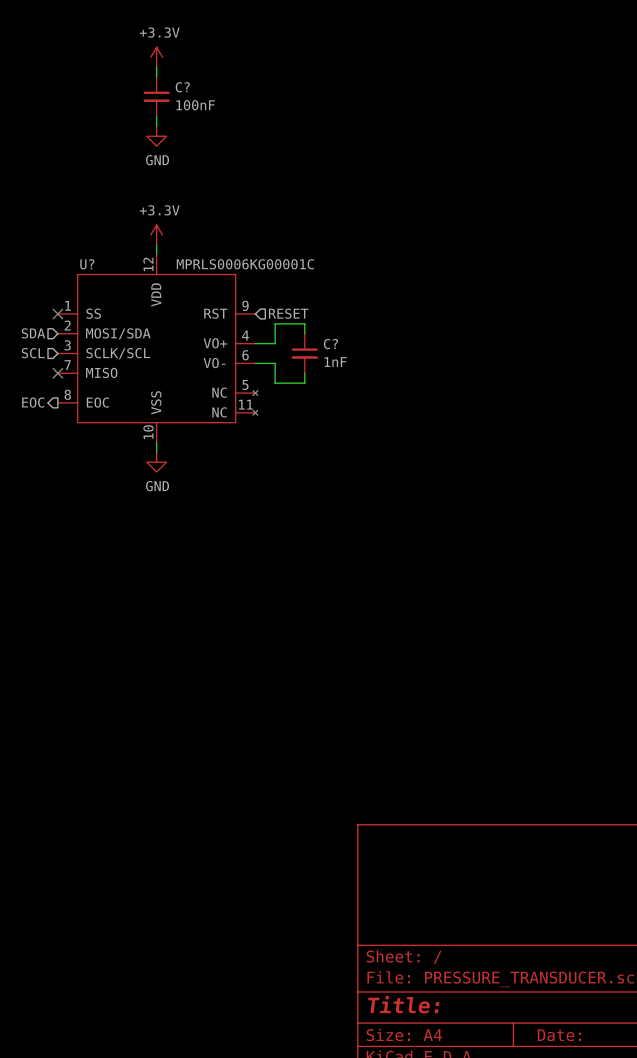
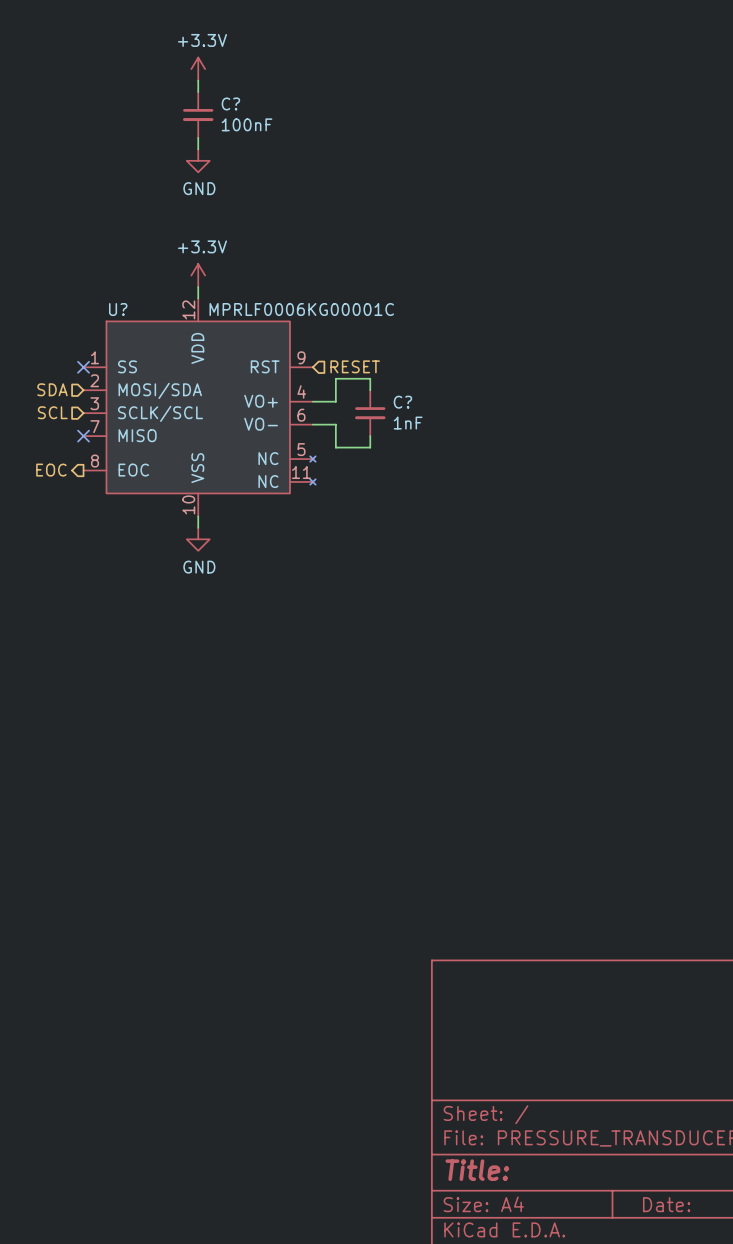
U? value: MPRLS0006KG00001C (245, 264) -> MPRLF0006KG00001C (301, 309)

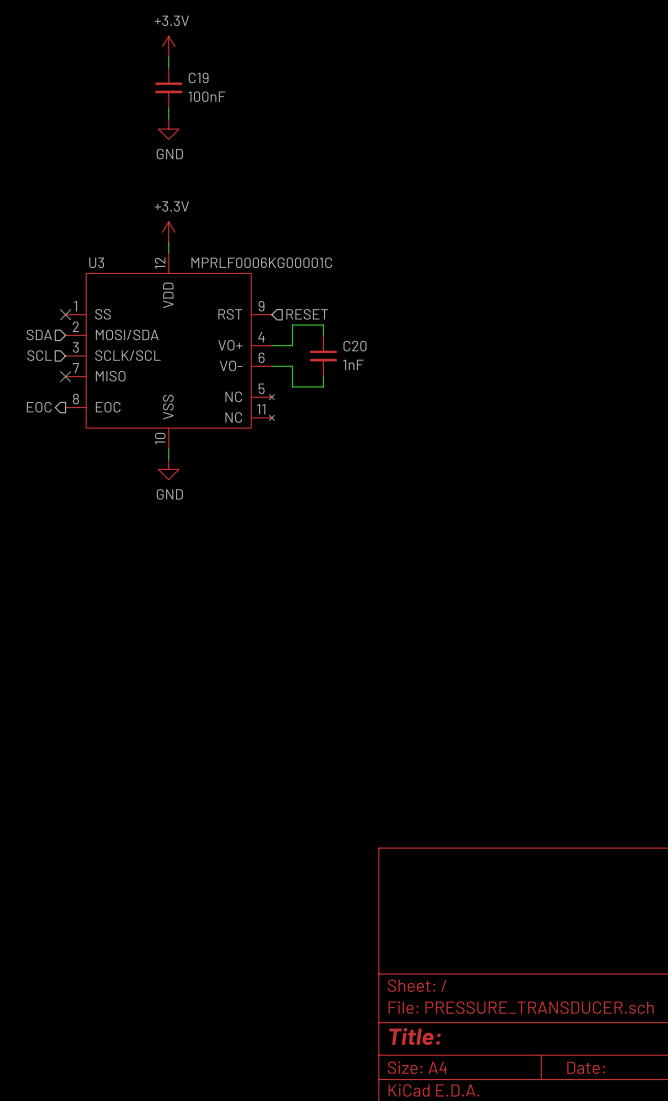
C? name: C? (230, 103) -> C19 (198, 77)
U? name: U? (118, 309) -> U3 (96, 262)
C? name: C? (402, 402) -> C20 (354, 346)

